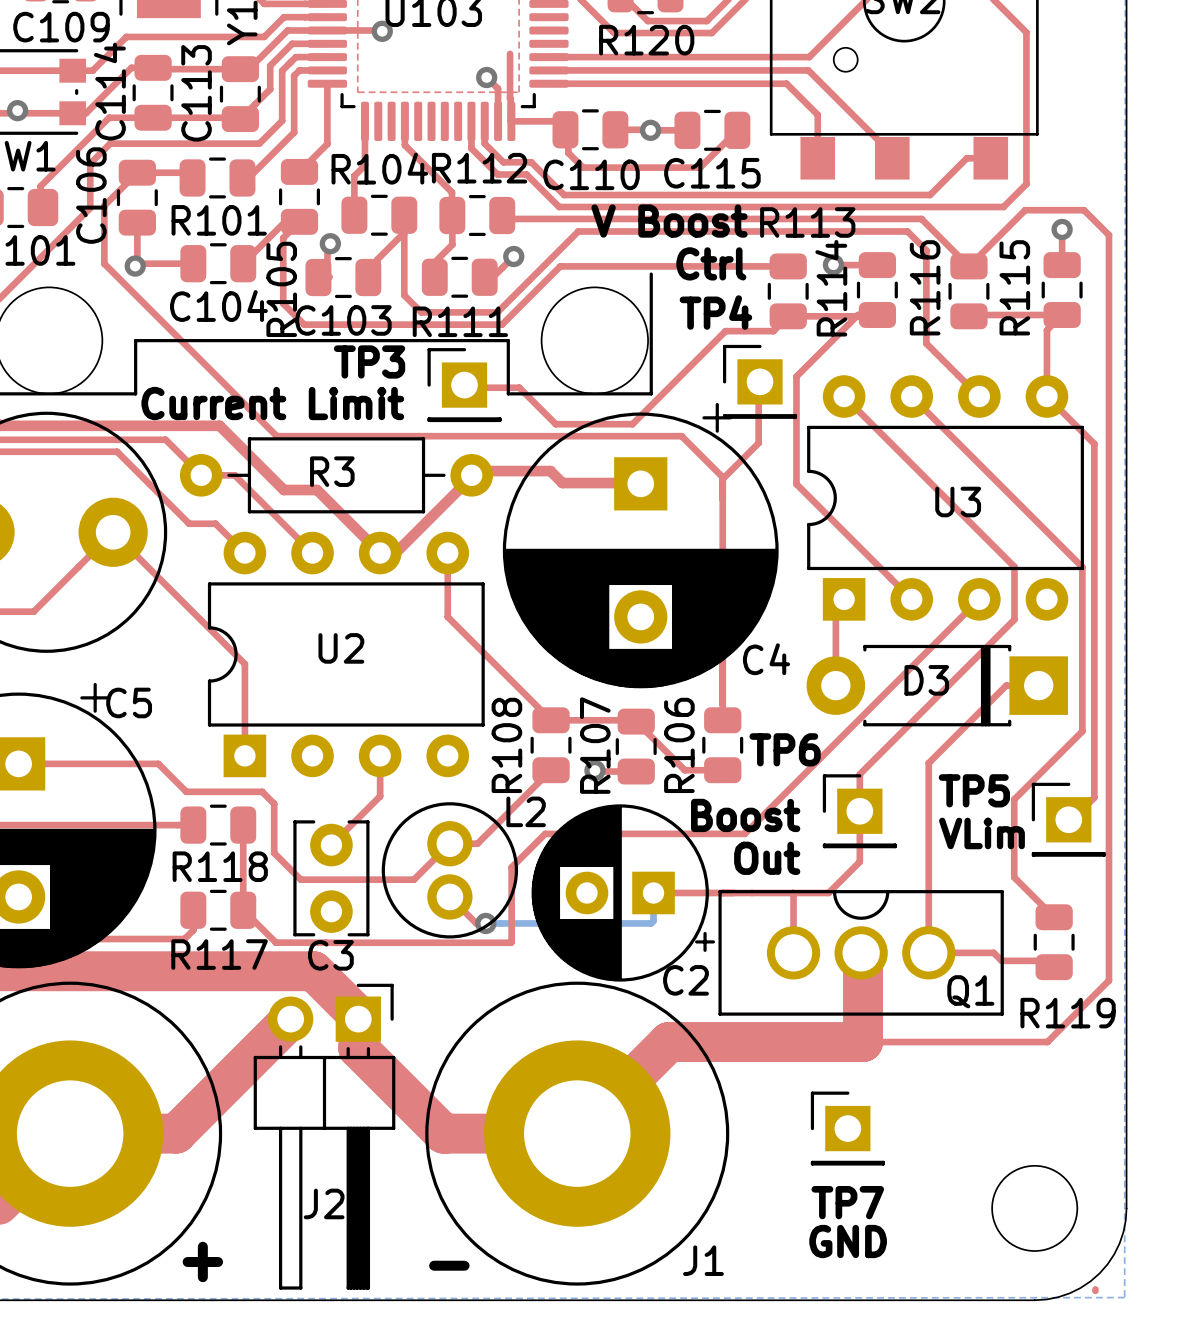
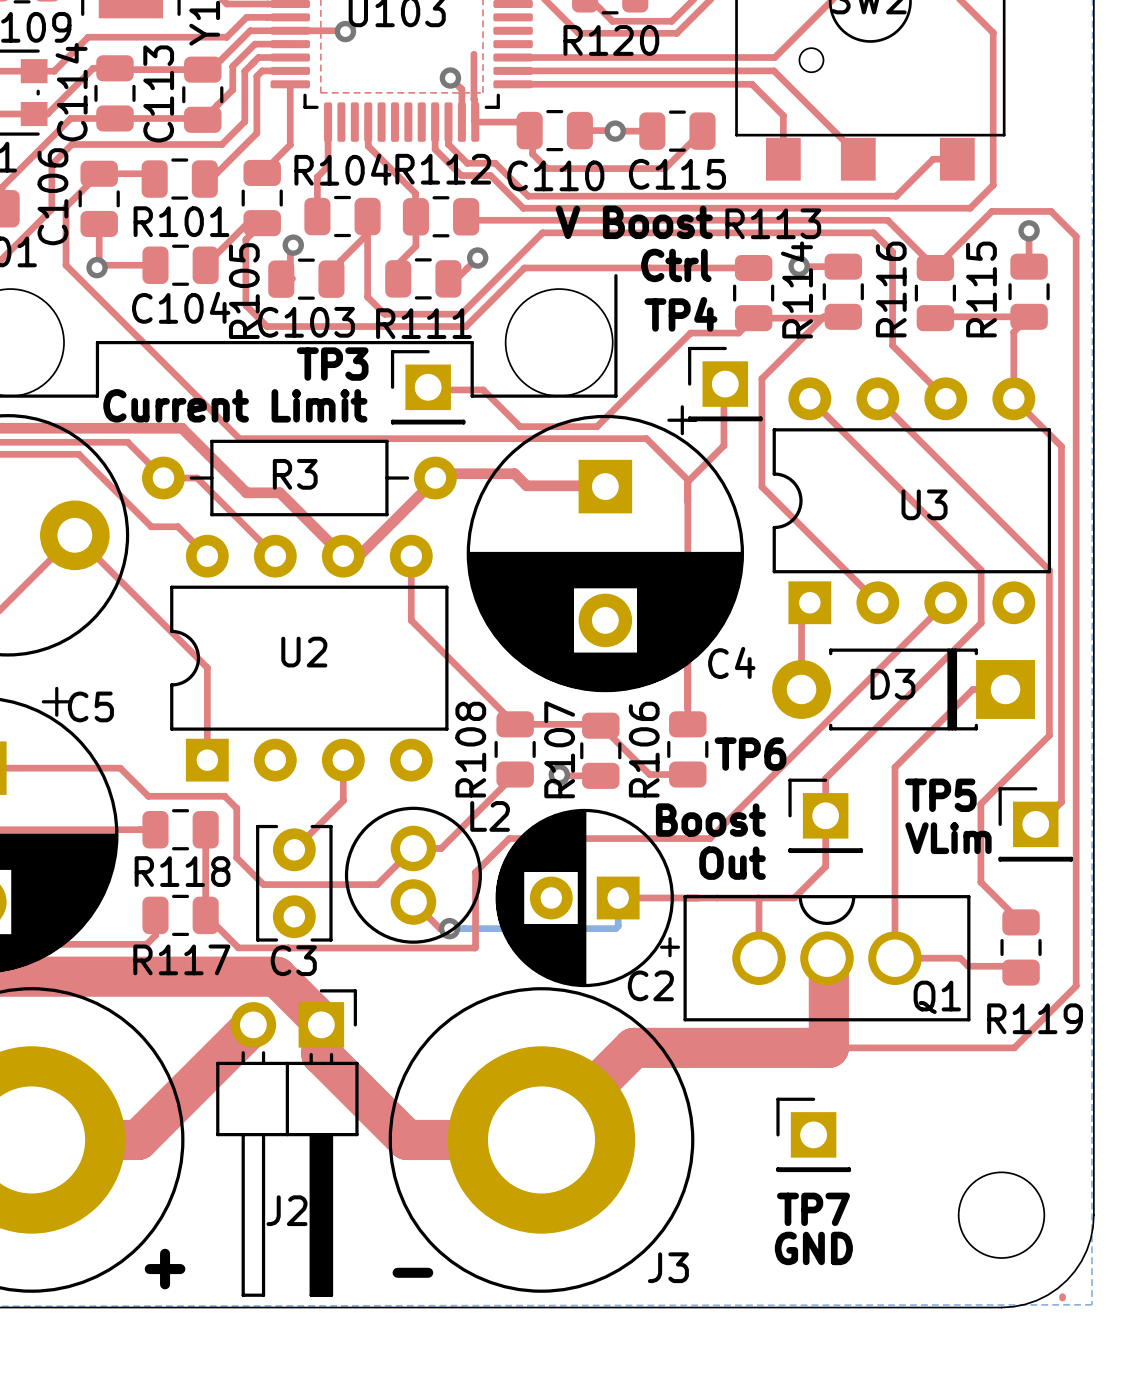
J1 name: J1 (703, 1260) -> J3 (668, 1267)

